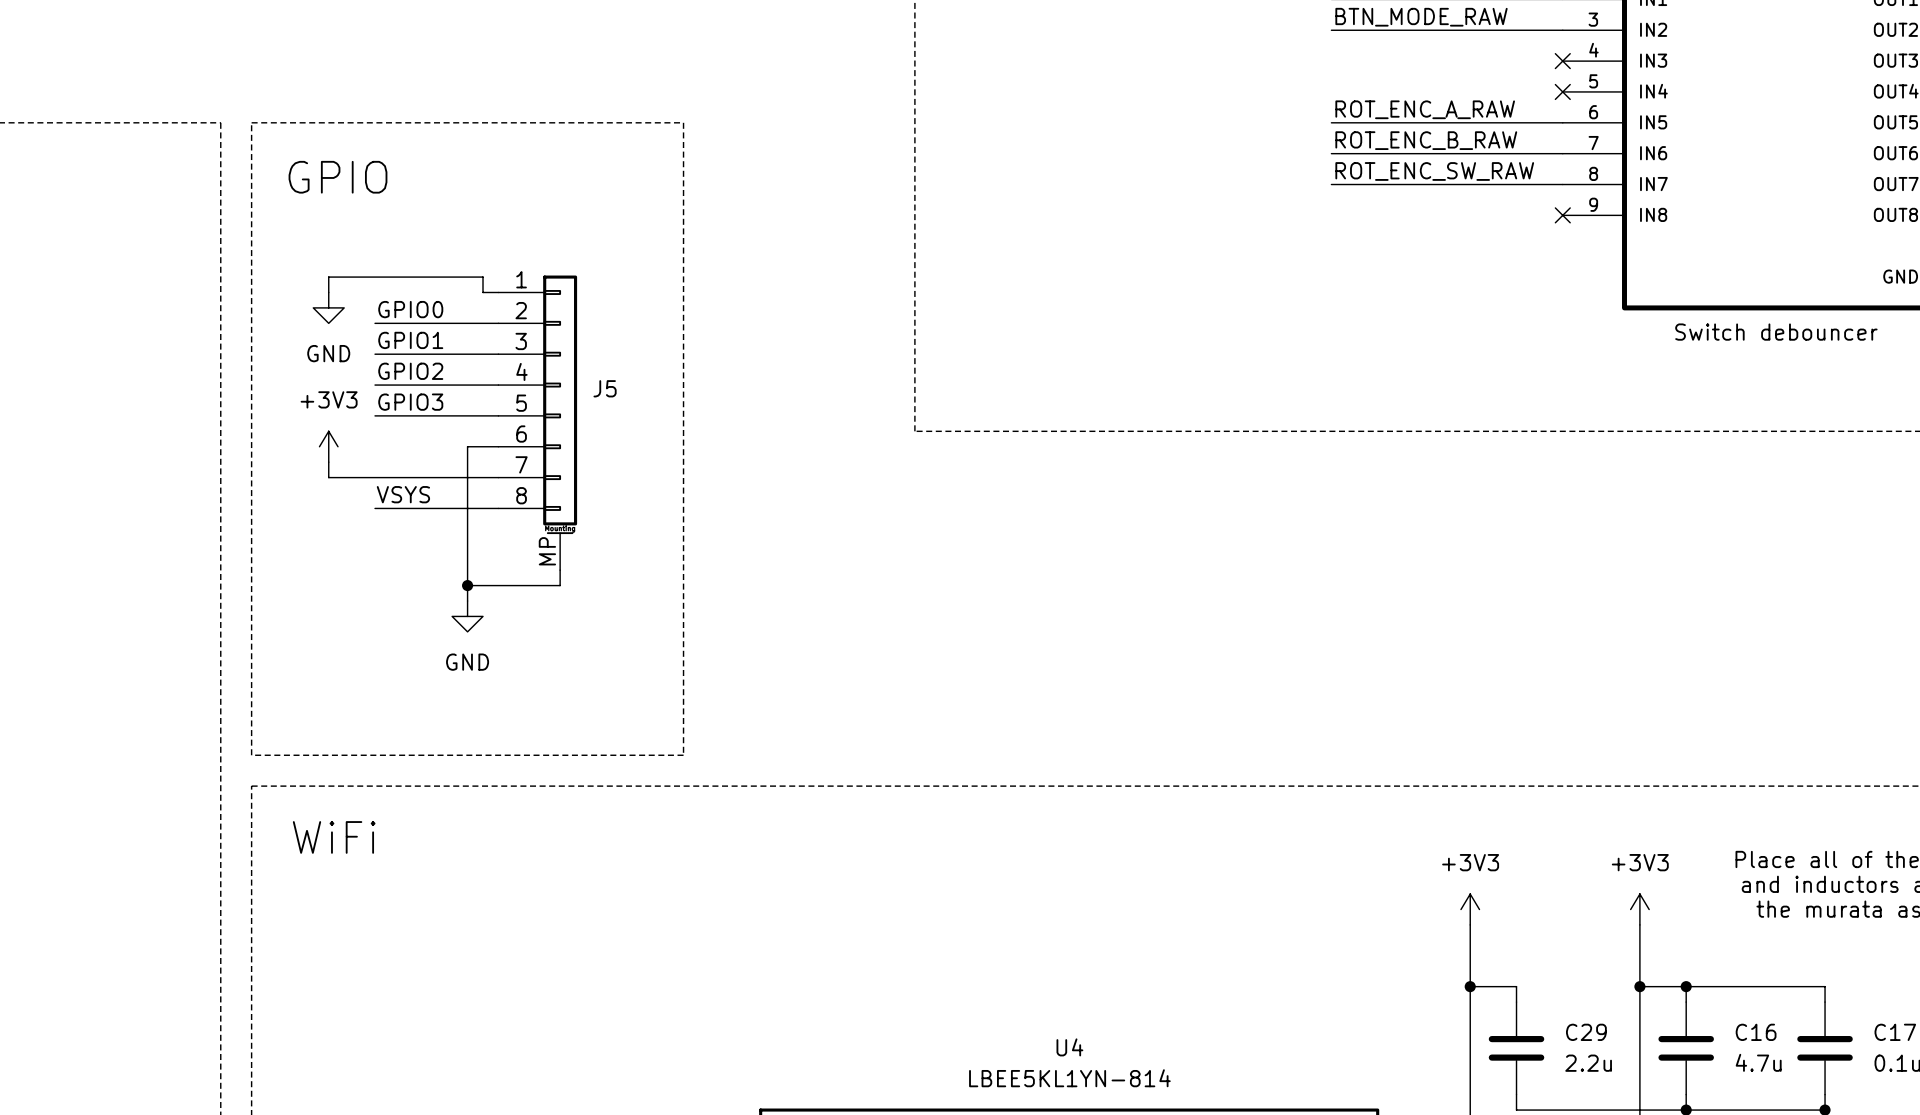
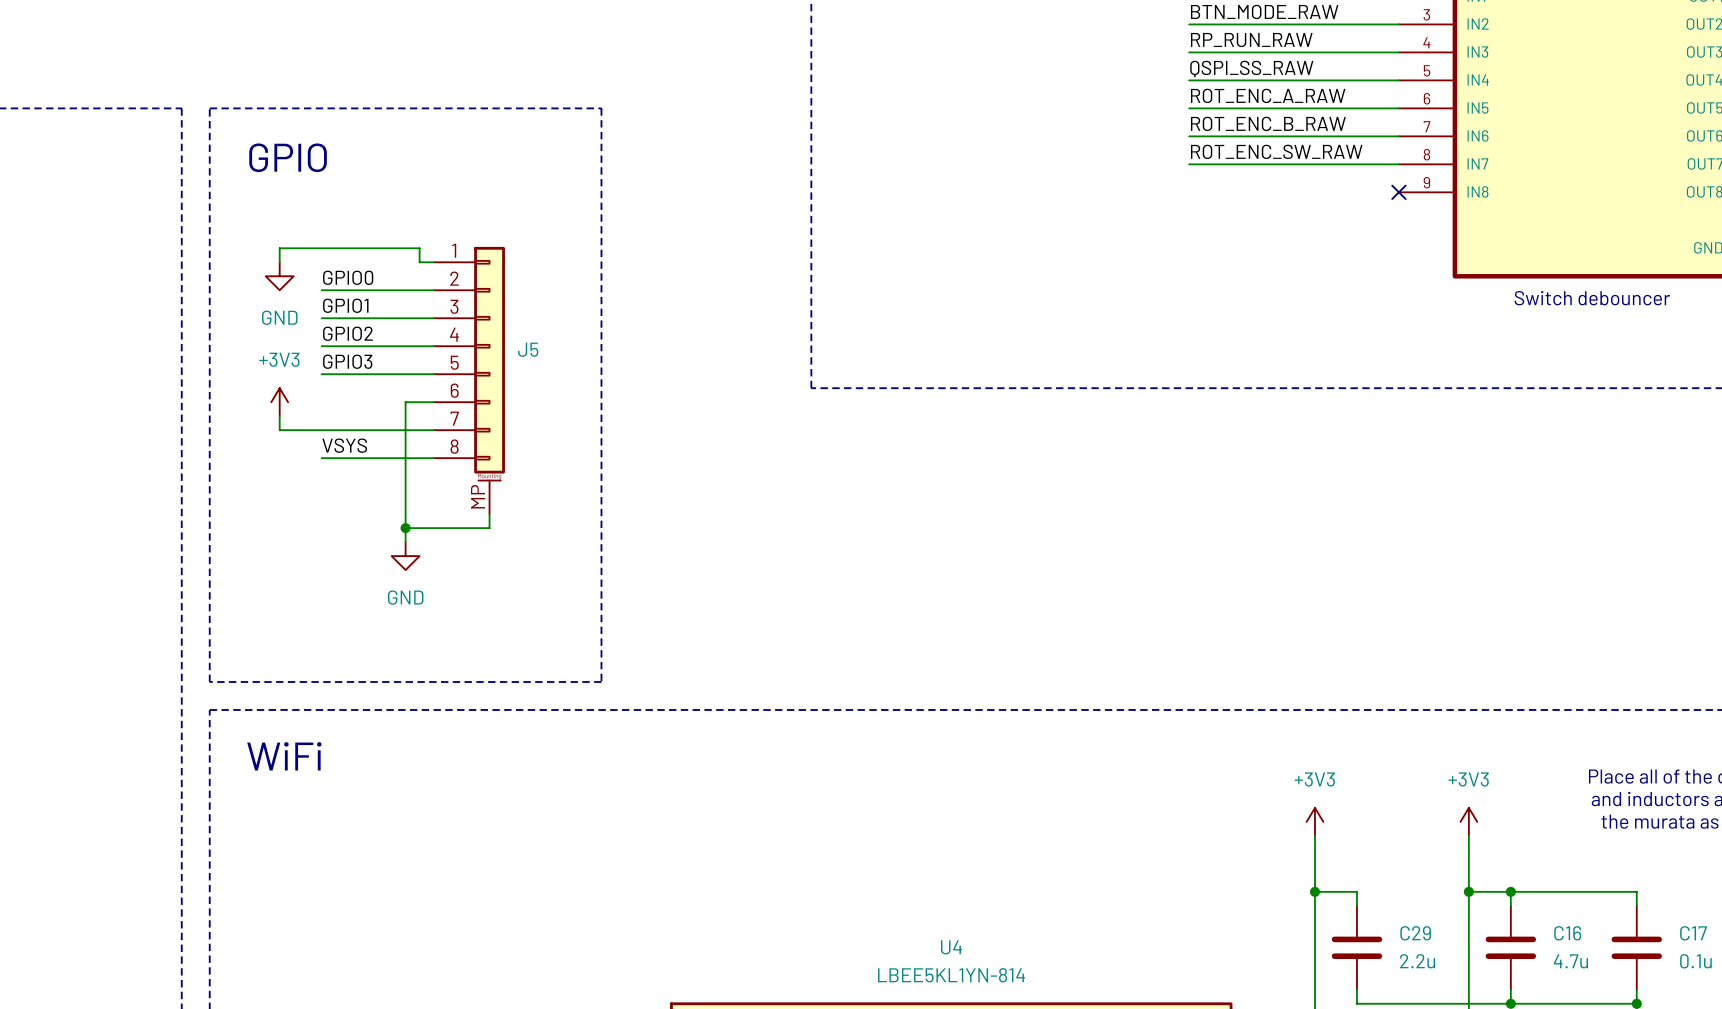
label: none -> RP_RUN_RAW (1251, 40)
wire: none -> (1189, 52) (1398, 52)
no-connect mark: (1562, 61) -> none
label: none -> QSPI_SS_RAW (1251, 68)
wire: none -> (1189, 80) (1398, 80)
no-connect mark: (1562, 91) -> none

